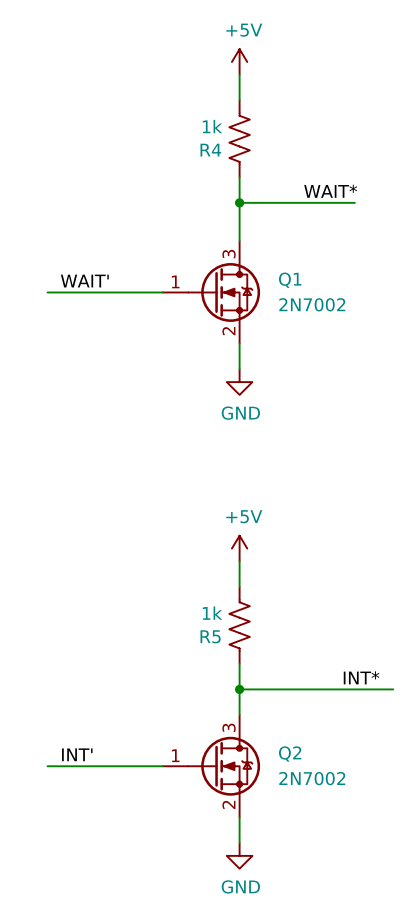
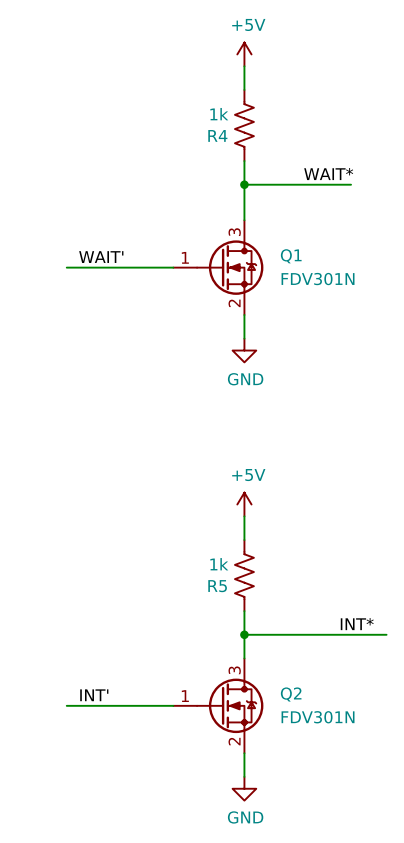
Q1 value: 2N7002 (312, 304) -> FDV301N (318, 279)
Q2 value: 2N7002 (312, 778) -> FDV301N (318, 717)

